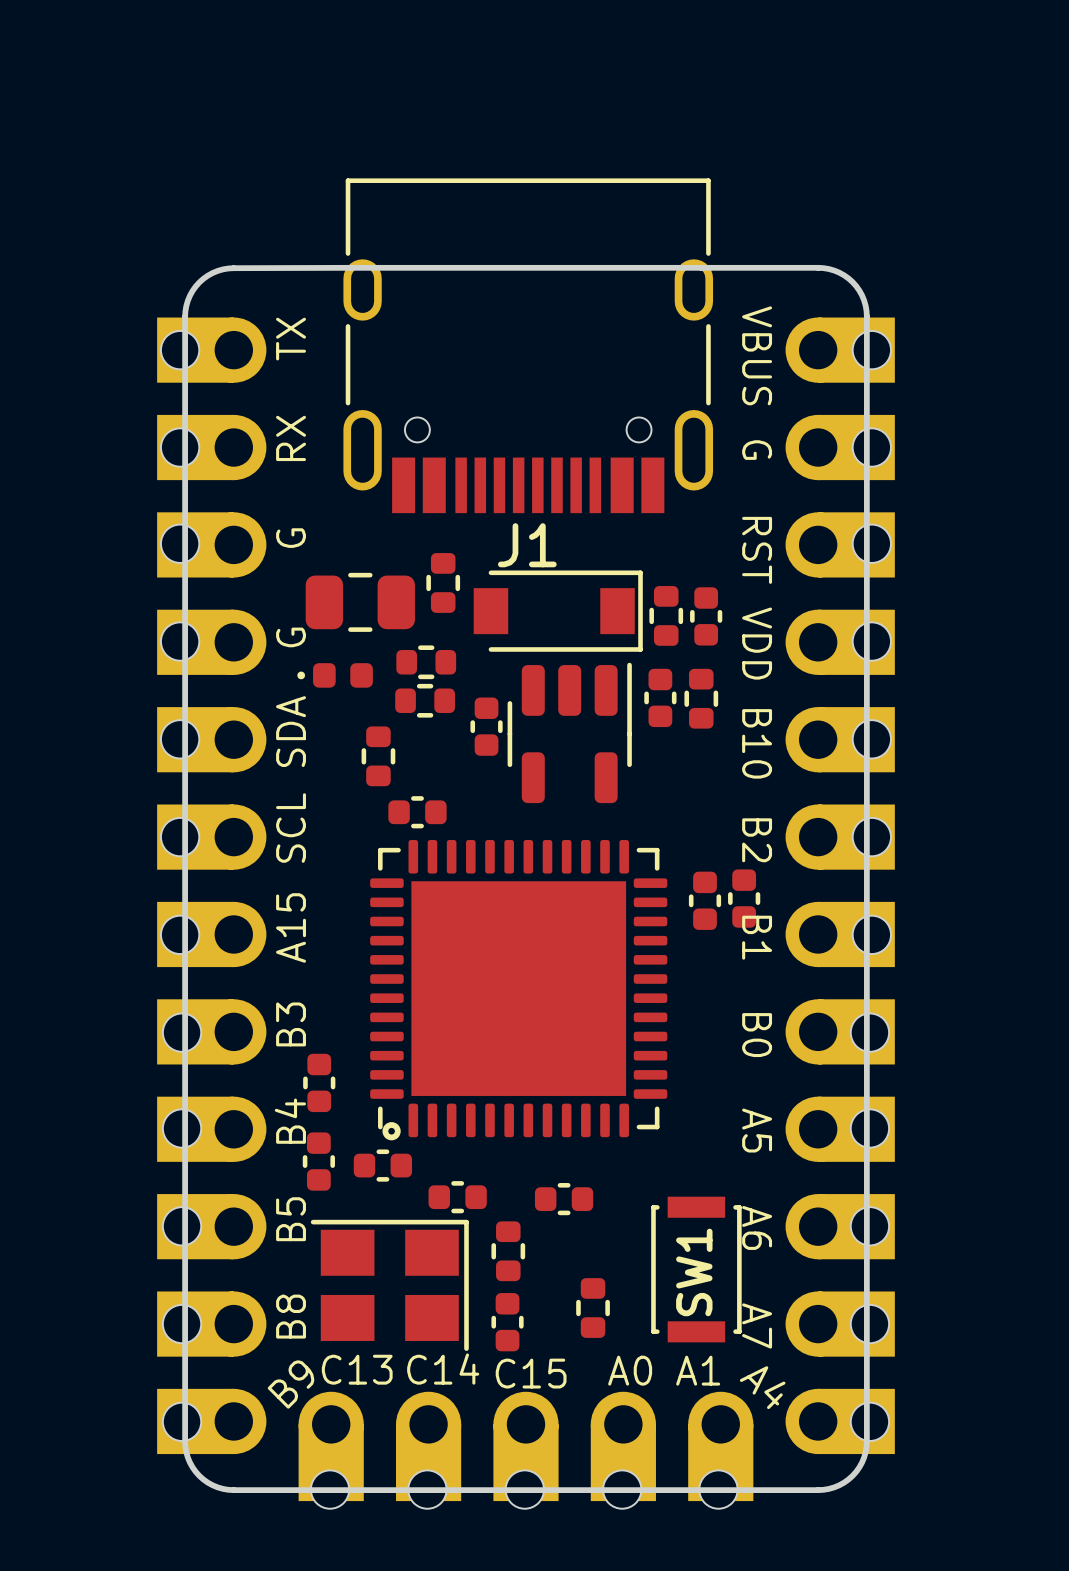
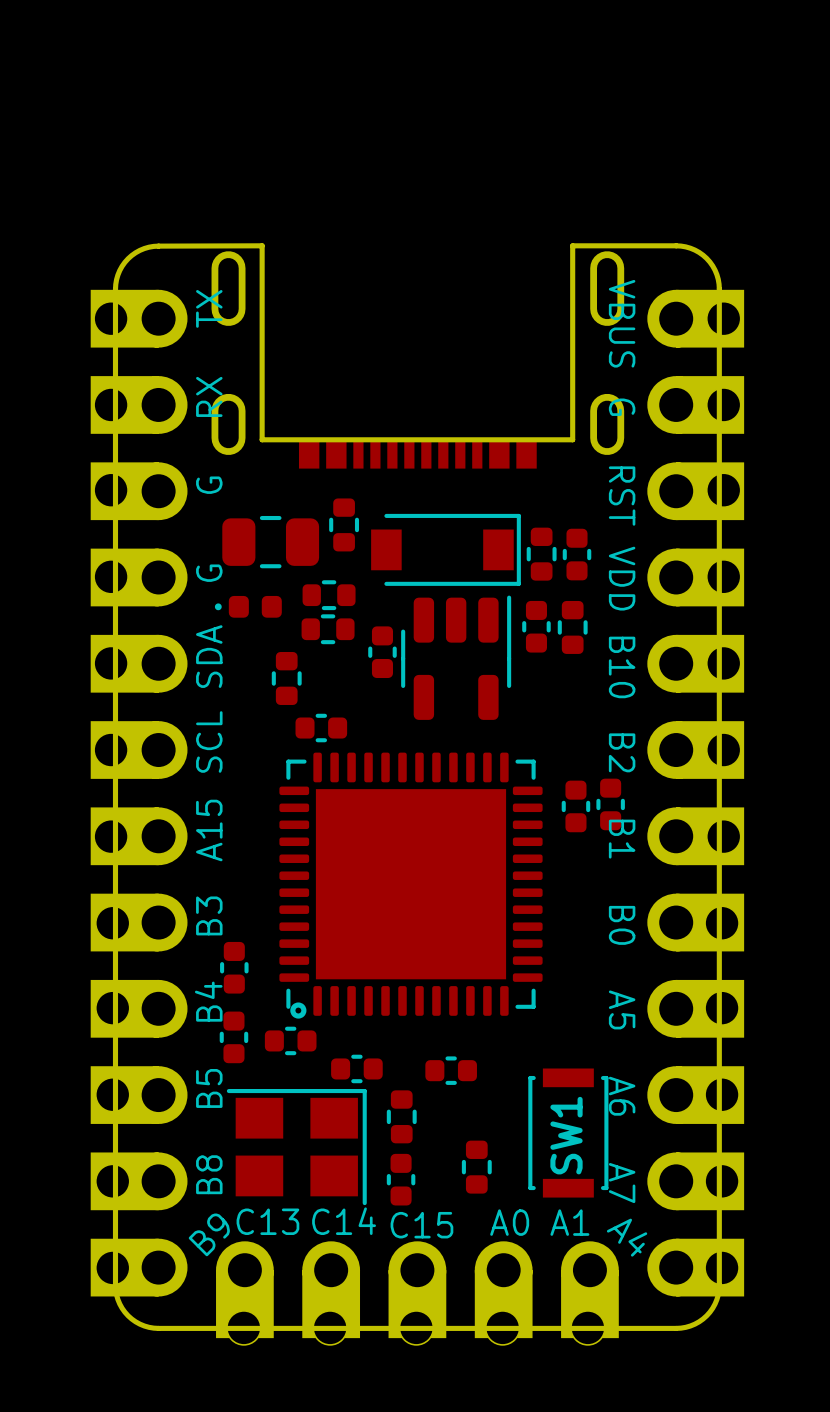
board edge: (350, 267) (701, 267) -> (262, 245) (262, 439) (572, 439) (572, 245)
J1: (528, 345) -> none
part: none -> (417, 359)

